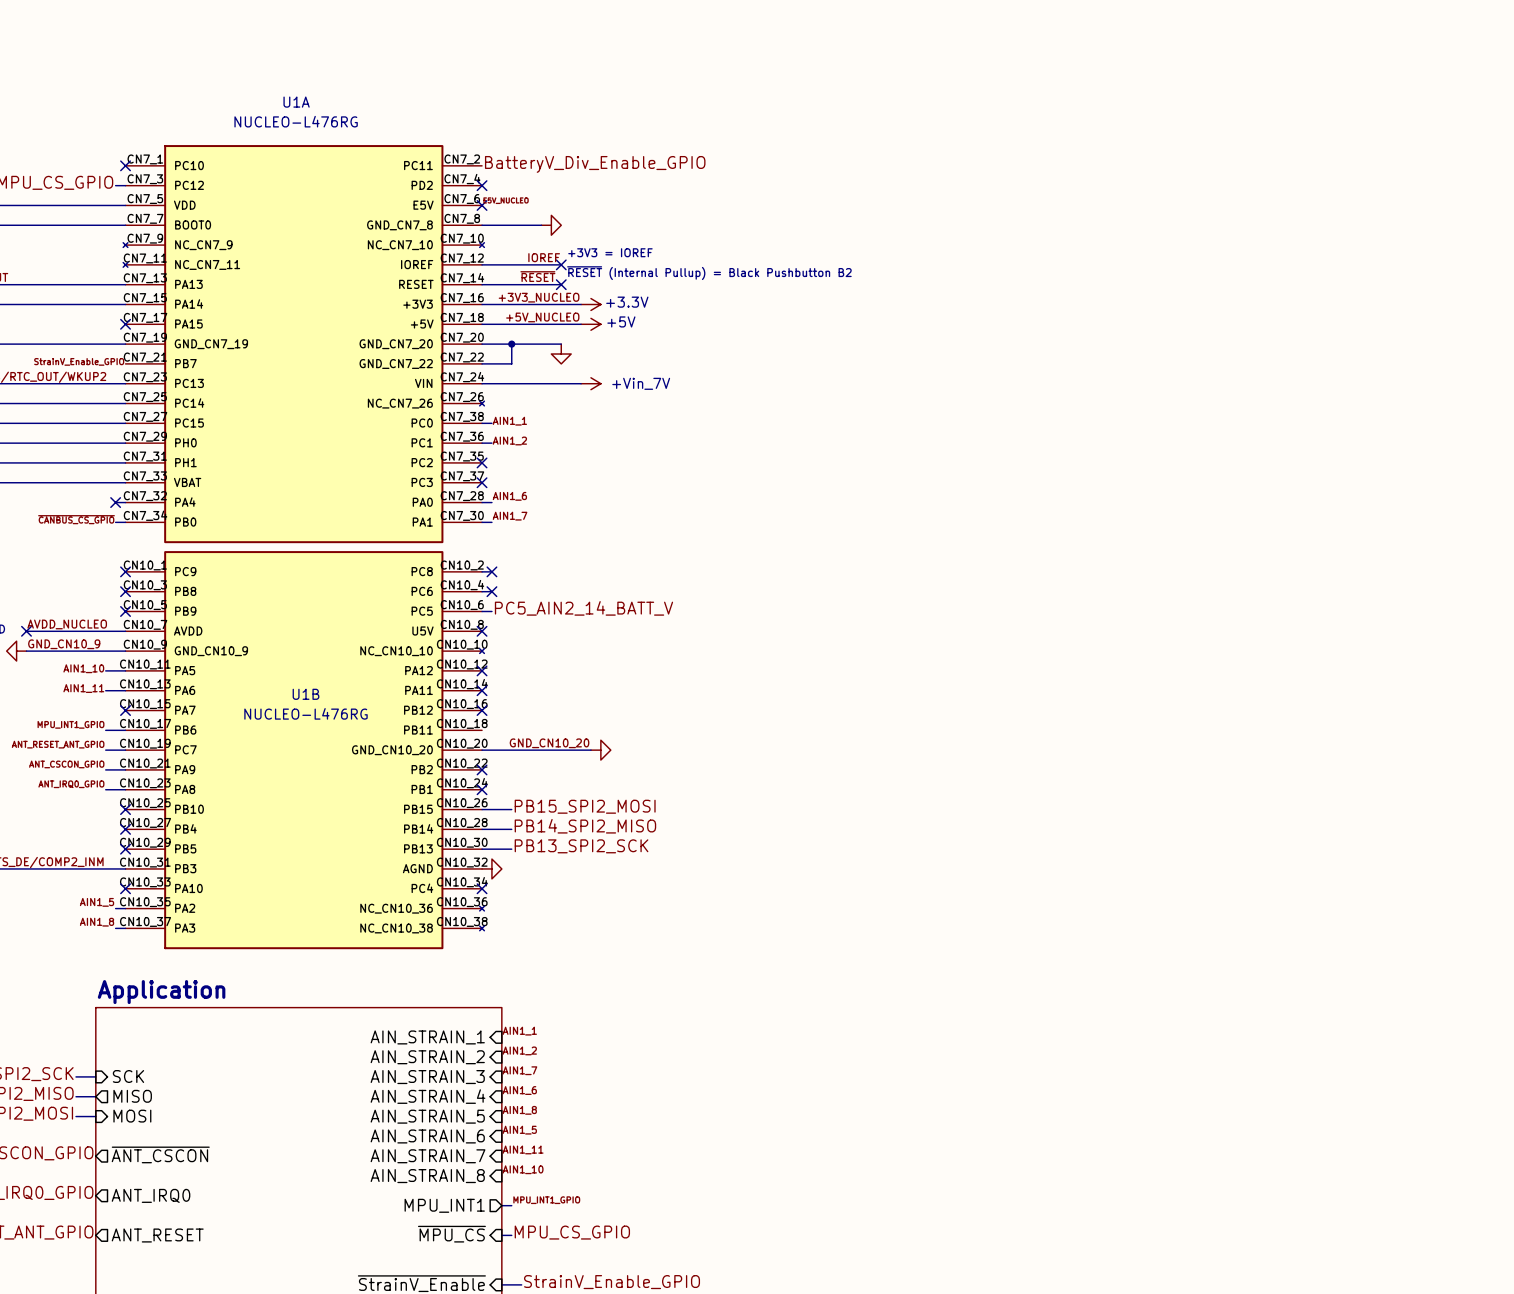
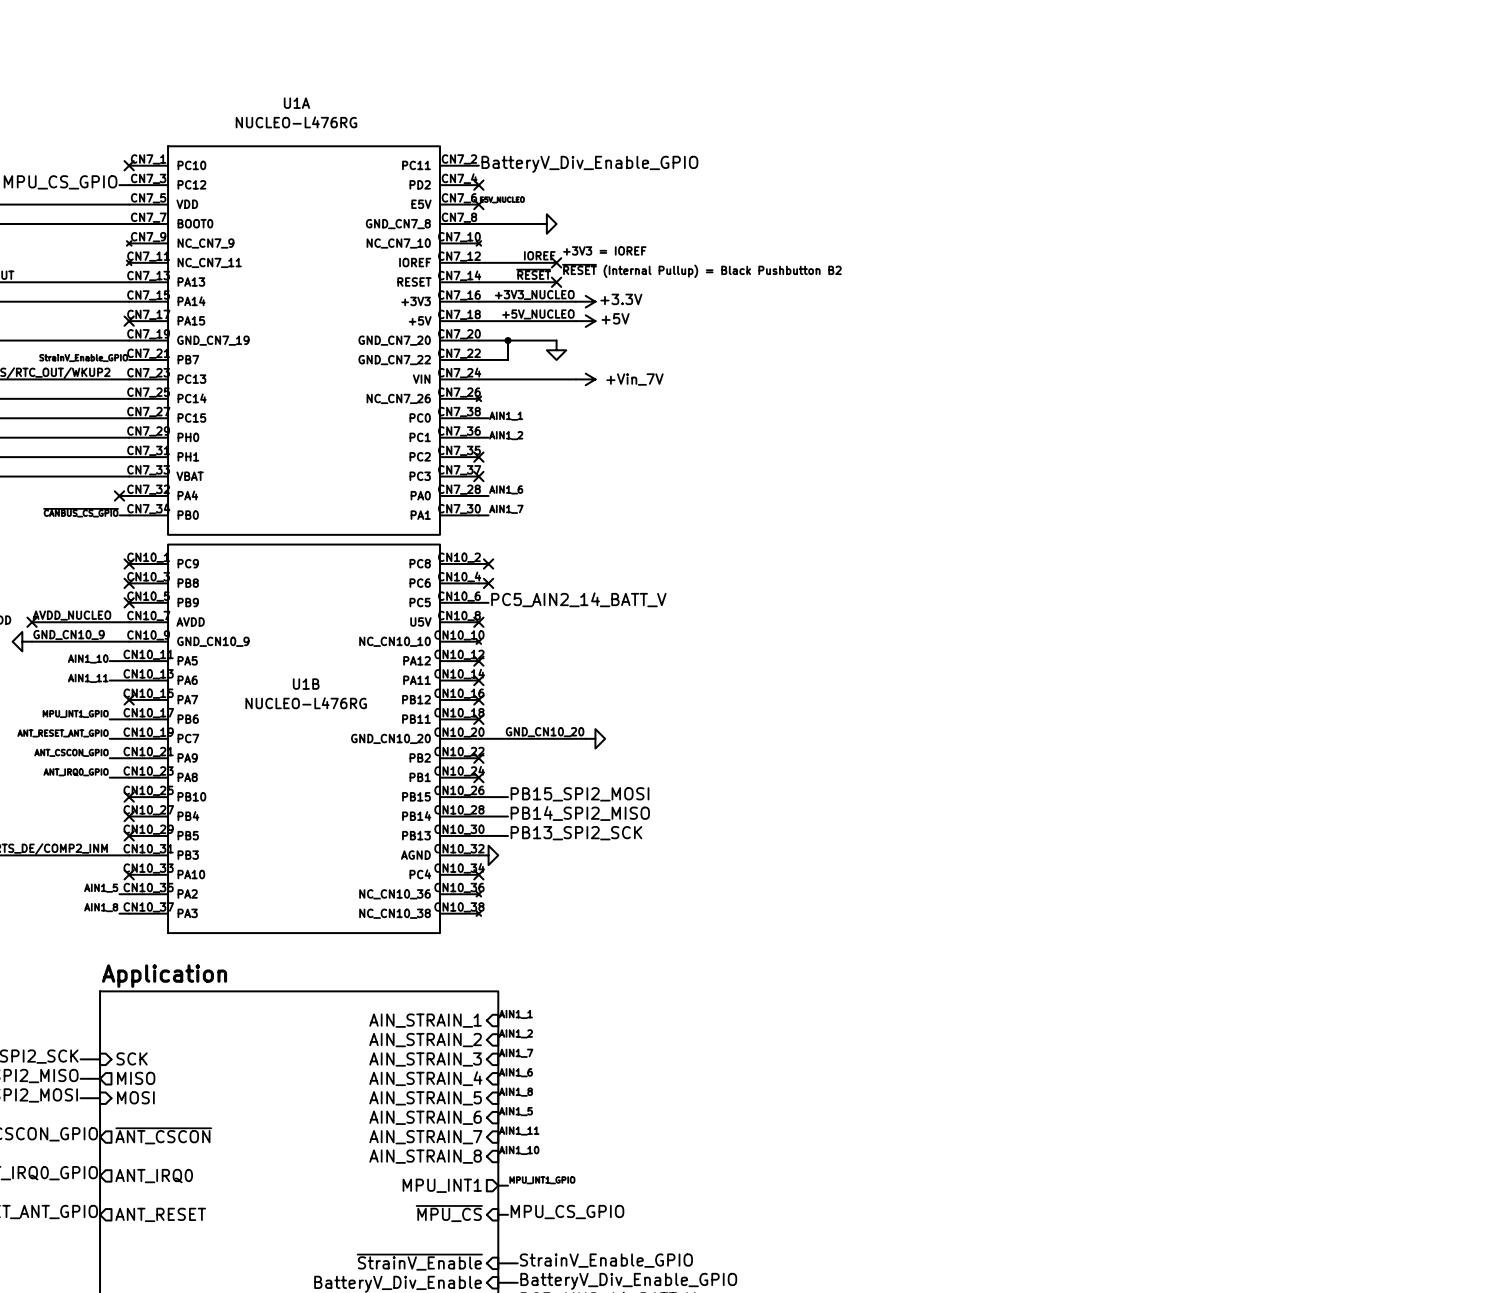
no-connect mark: none -> (478, 719)

